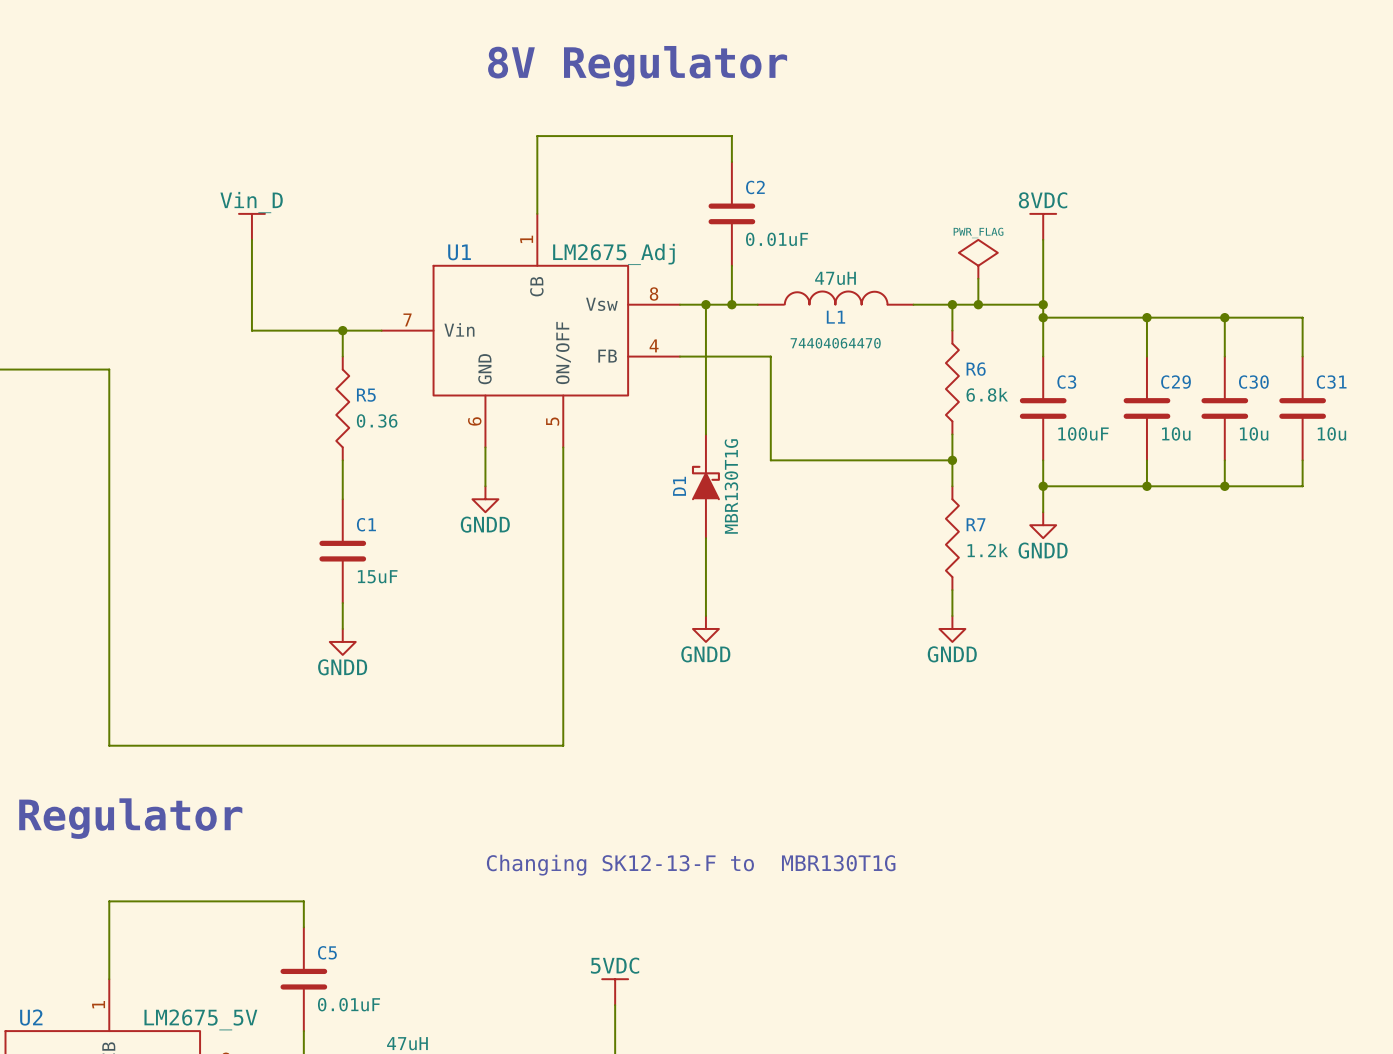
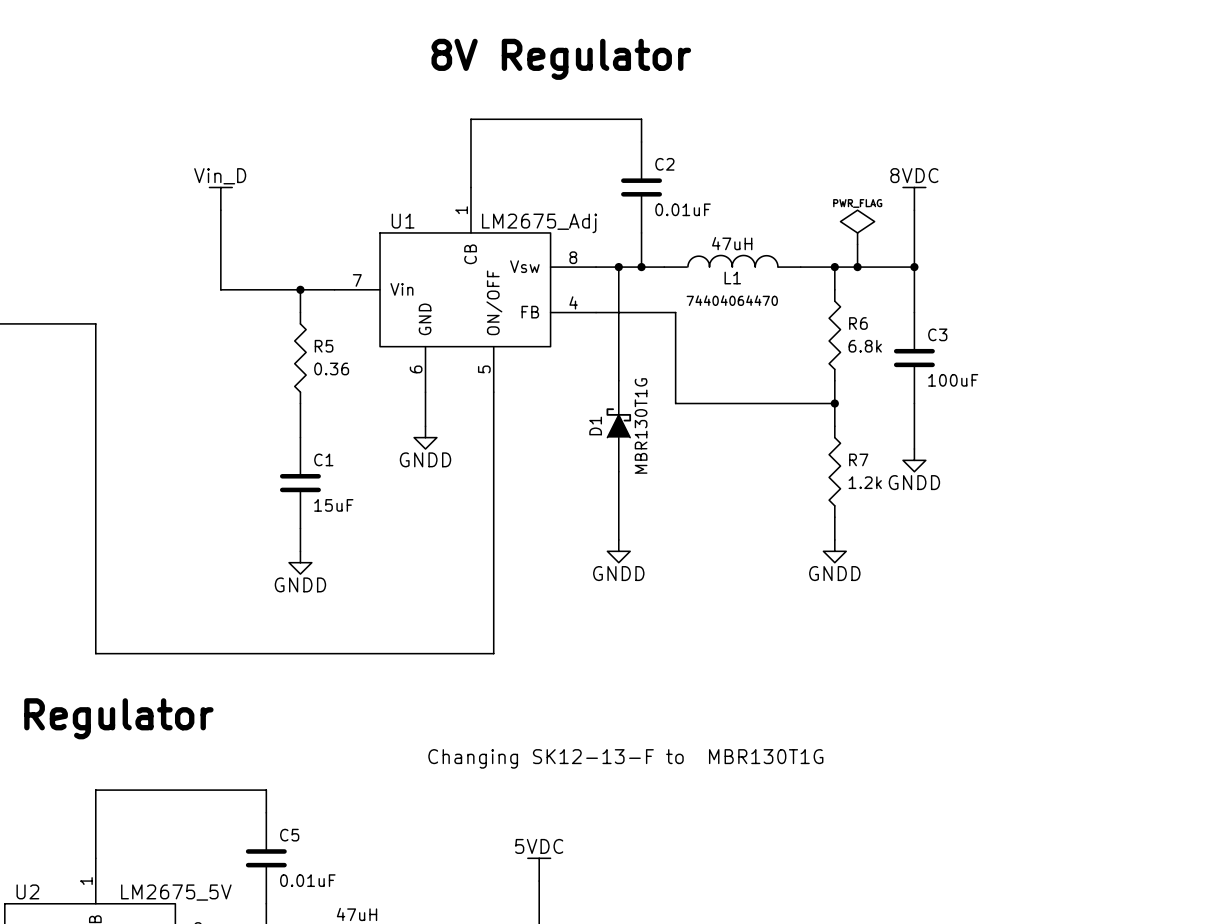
wire: (1043, 317) (1302, 317) (1302, 356) -> none
junction: (1043, 317) -> none
wire: (1146, 317) (1146, 356) -> none
junction: (1146, 317) -> none
wire: (1224, 317) (1224, 356) -> none
junction: (1224, 317) -> none
C29: 10u (1146, 408) -> none
C30: 10u (1224, 408) -> none
C31: 10u (1302, 408) -> none
wire: (1146, 460) (1146, 486) -> none
wire: (1224, 460) (1224, 486) -> none
wire: (1302, 460) (1302, 486) (1043, 486) -> none
junction: (1043, 486) -> none
junction: (1146, 486) -> none
junction: (1224, 486) -> none

